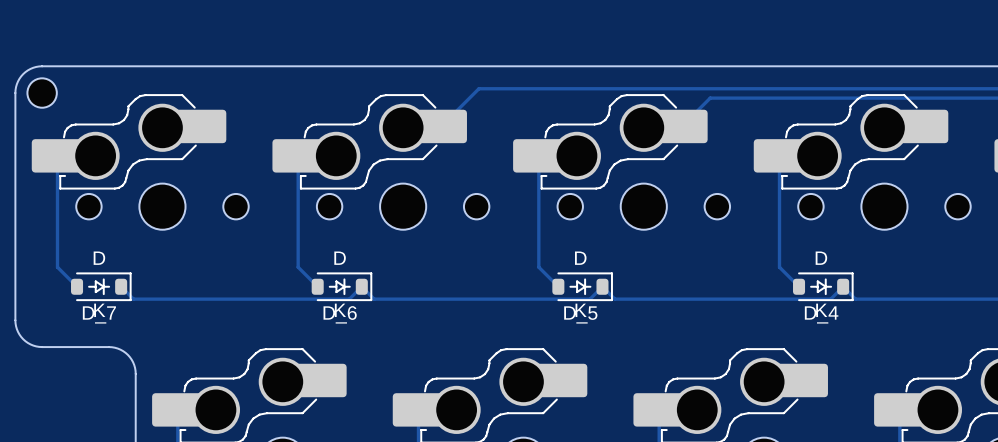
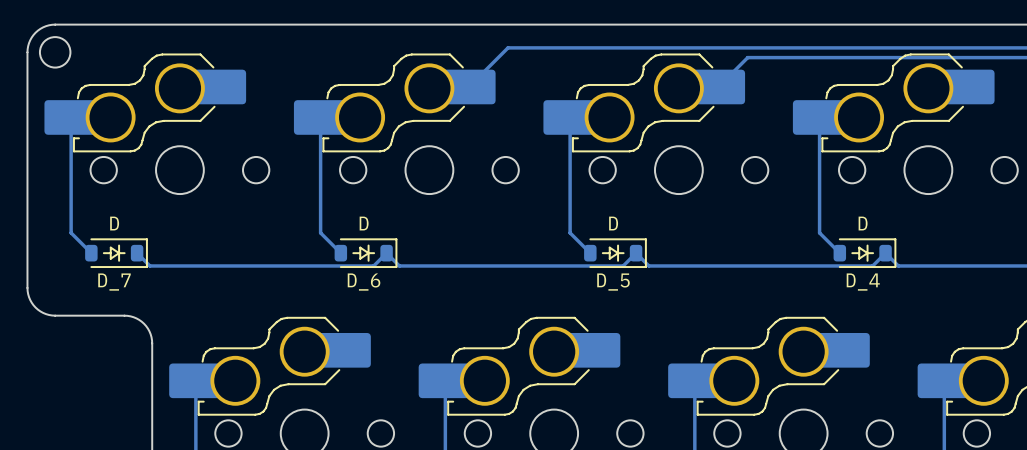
D_7 text: K (99, 310) -> none
D_6 text: K (340, 310) -> none
D_5 text: K (581, 310) -> none
D_4 text: K (821, 310) -> none

